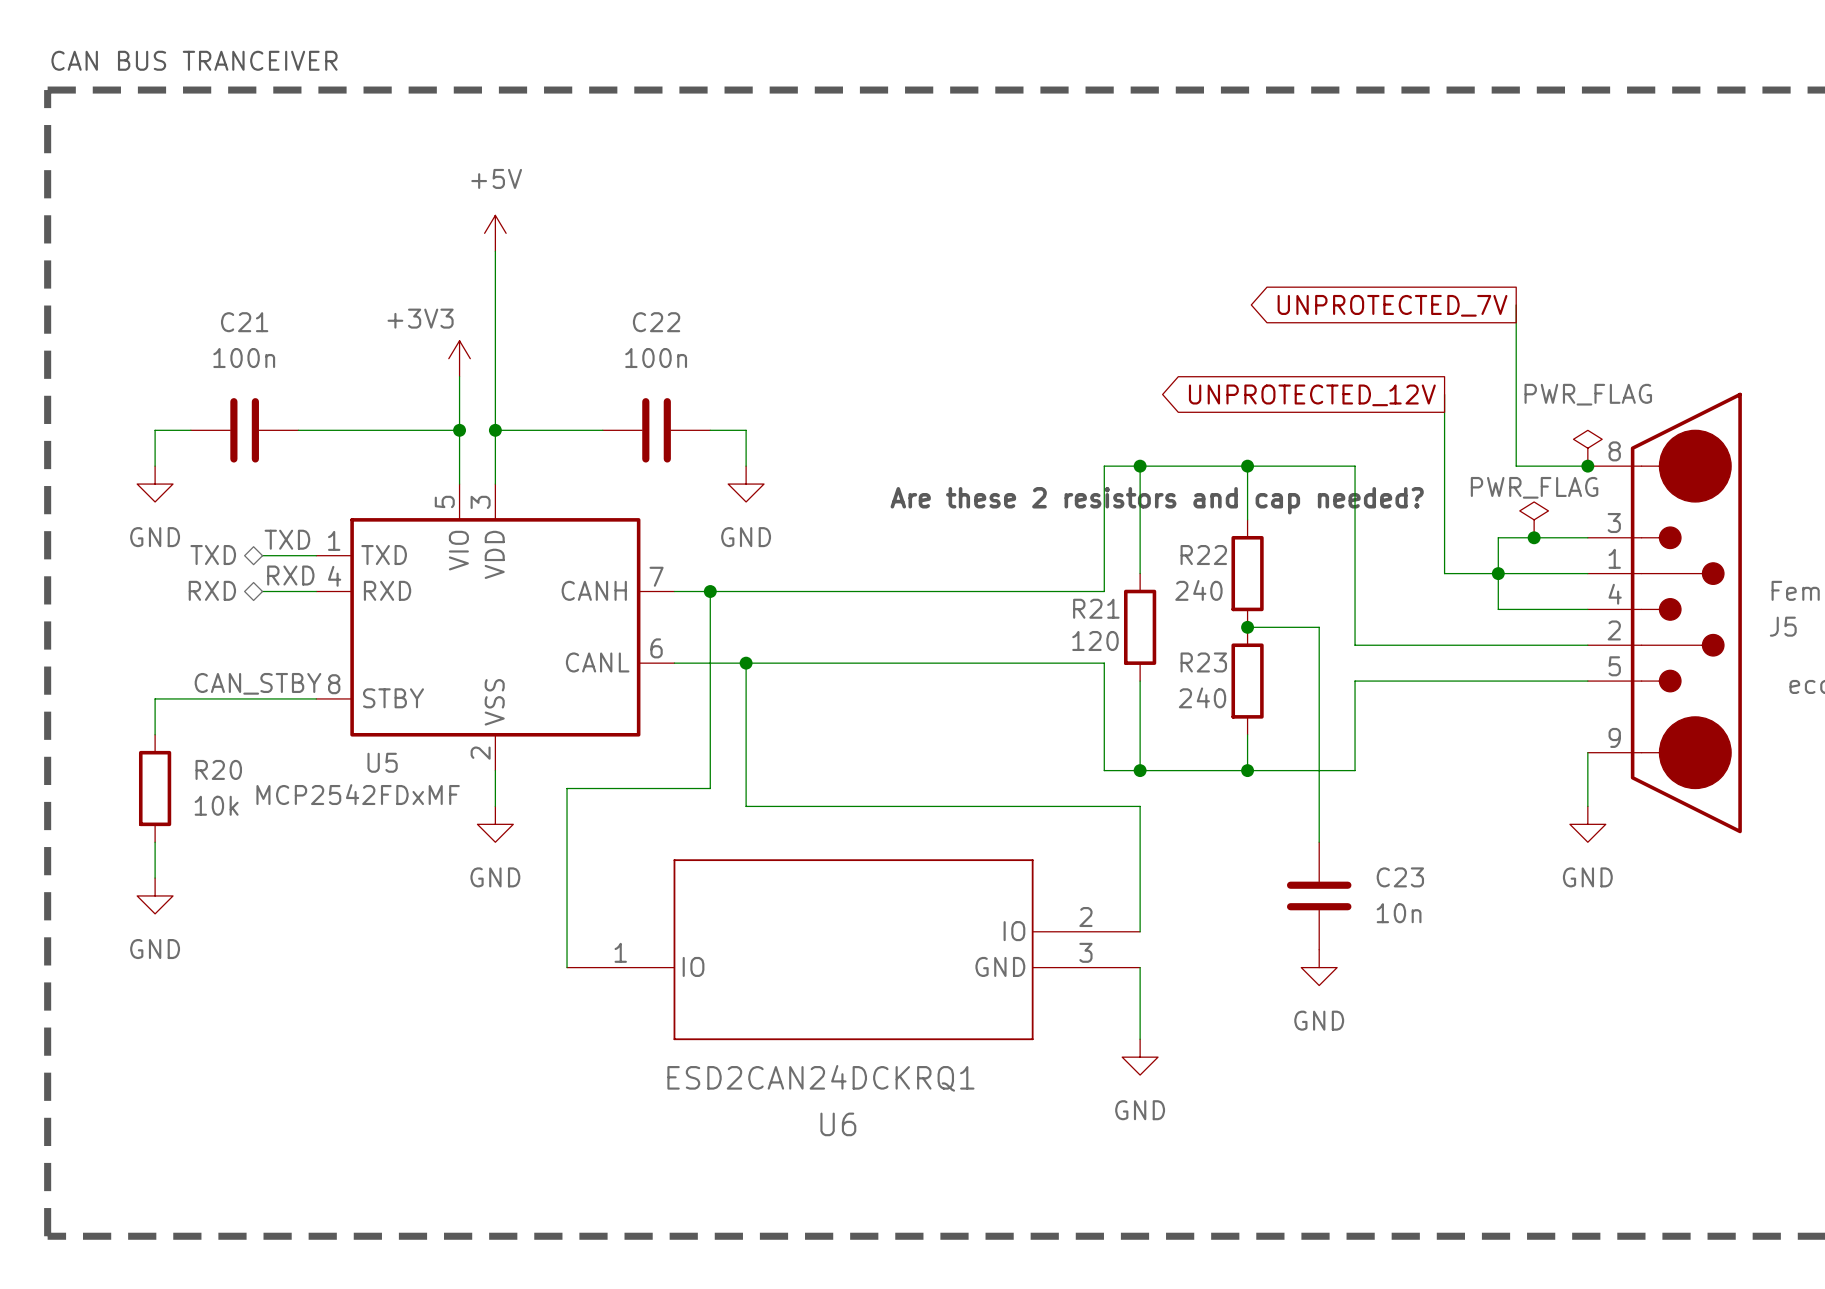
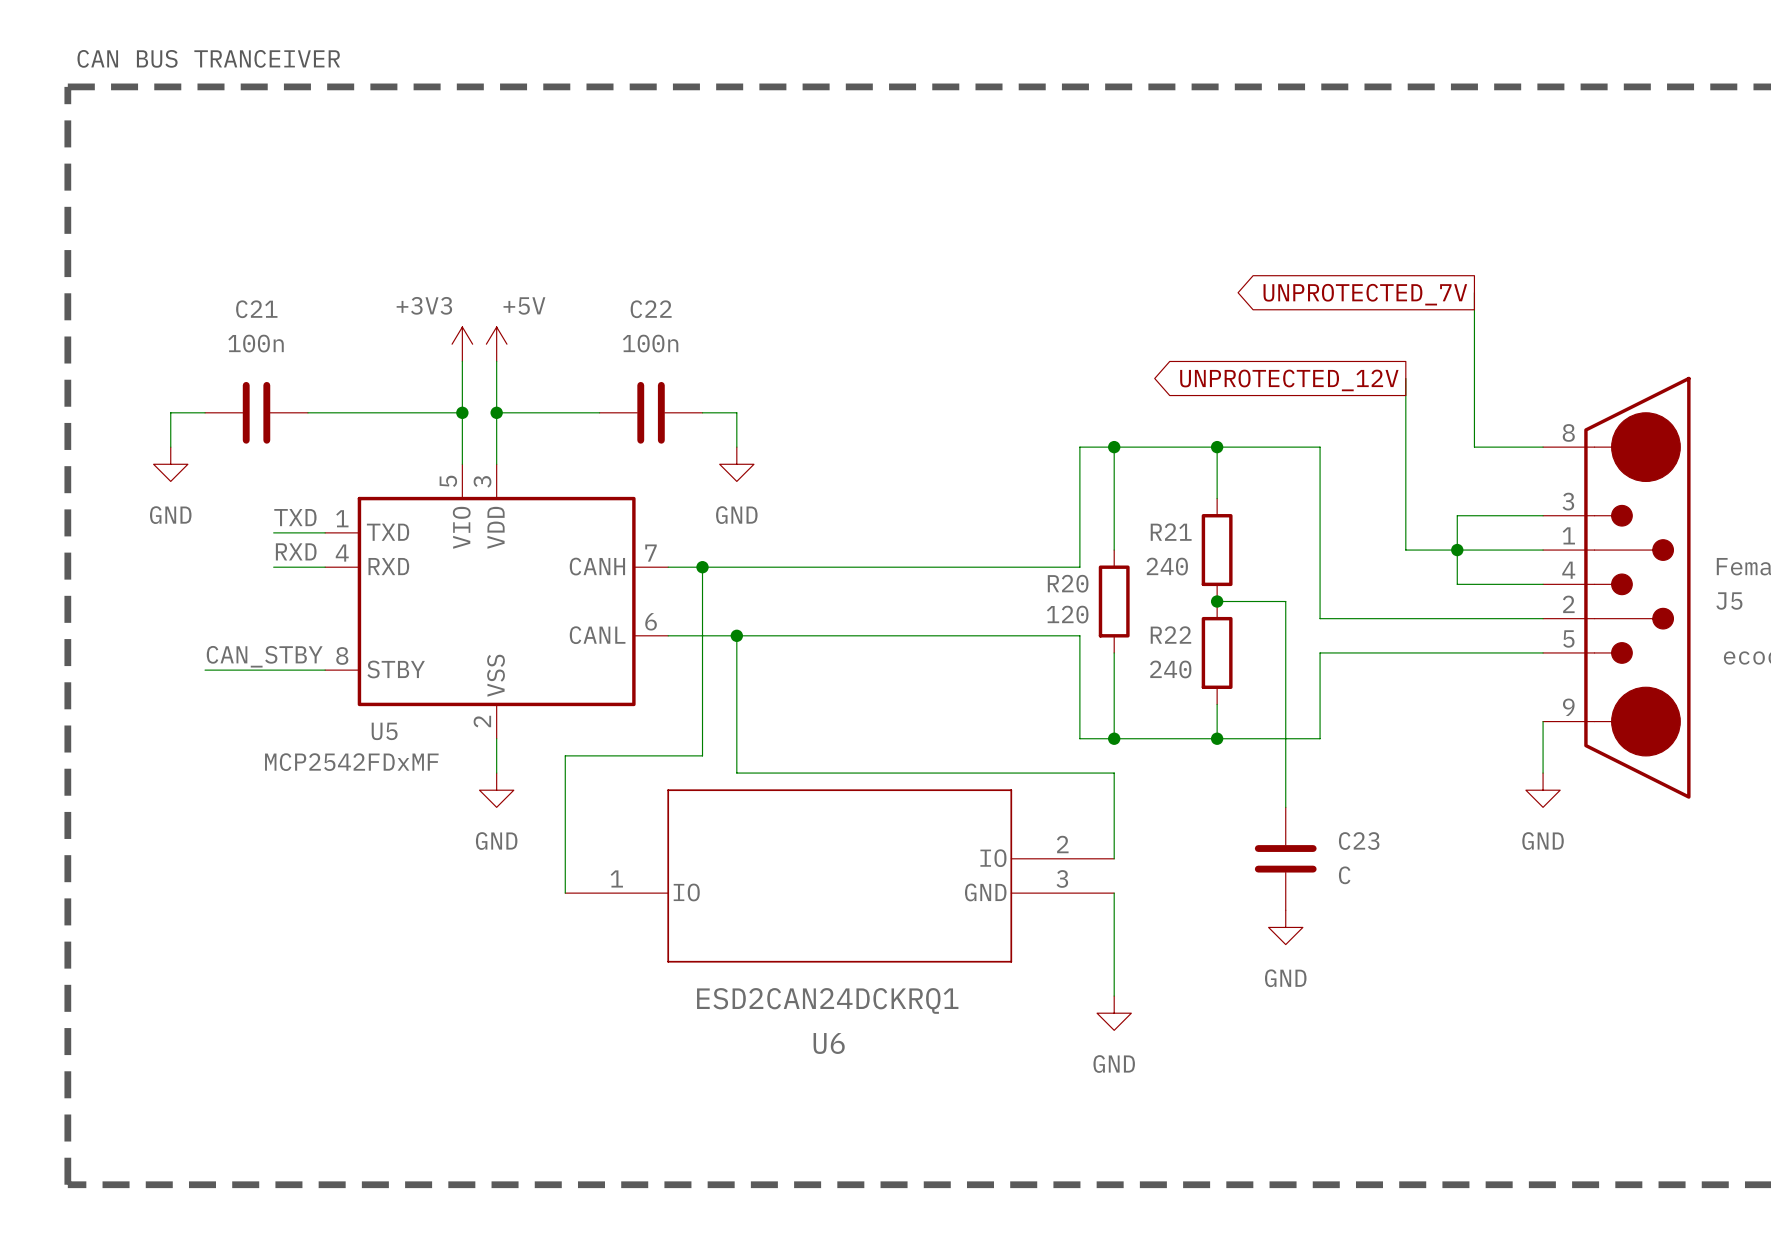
power symbol text position: +5V (496, 178) -> +5V (524, 305)
power symbol position: +5V (495, 233) -> +5V (496, 344)
wire: (495, 251) (495, 376) -> none
power symbol: PWR_FLAG (1587, 448) -> none
junction: (1587, 466) -> none
text: Are these 2 resistors and cap needed? (1157, 500) -> none
power symbol: PWR_FLAG (1534, 519) -> none
junction: (1534, 537) -> none
hierarchical label: TXD (213, 555) -> none
R22 name: R22 (1203, 555) -> R21 (1171, 532)
hierarchical label: RXD (212, 590) -> none
R21 name: R21 (1096, 608) -> R20 (1068, 583)
R23 name: R23 (1203, 662) -> R22 (1170, 635)
wire: (190, 698) (155, 698) (155, 734) -> none
R20: 10k (155, 788) -> none
wire: (155, 842) (155, 878) -> none
power symbol: GND (155, 895) -> none
wire: (1140, 895) (1140, 931) -> (1114, 927) (1114, 893)
C23 value: 10n (1399, 913) -> C (1344, 875)
wire: (567, 931) (567, 967) -> none
U6 position: (853, 949) -> (839, 875)

